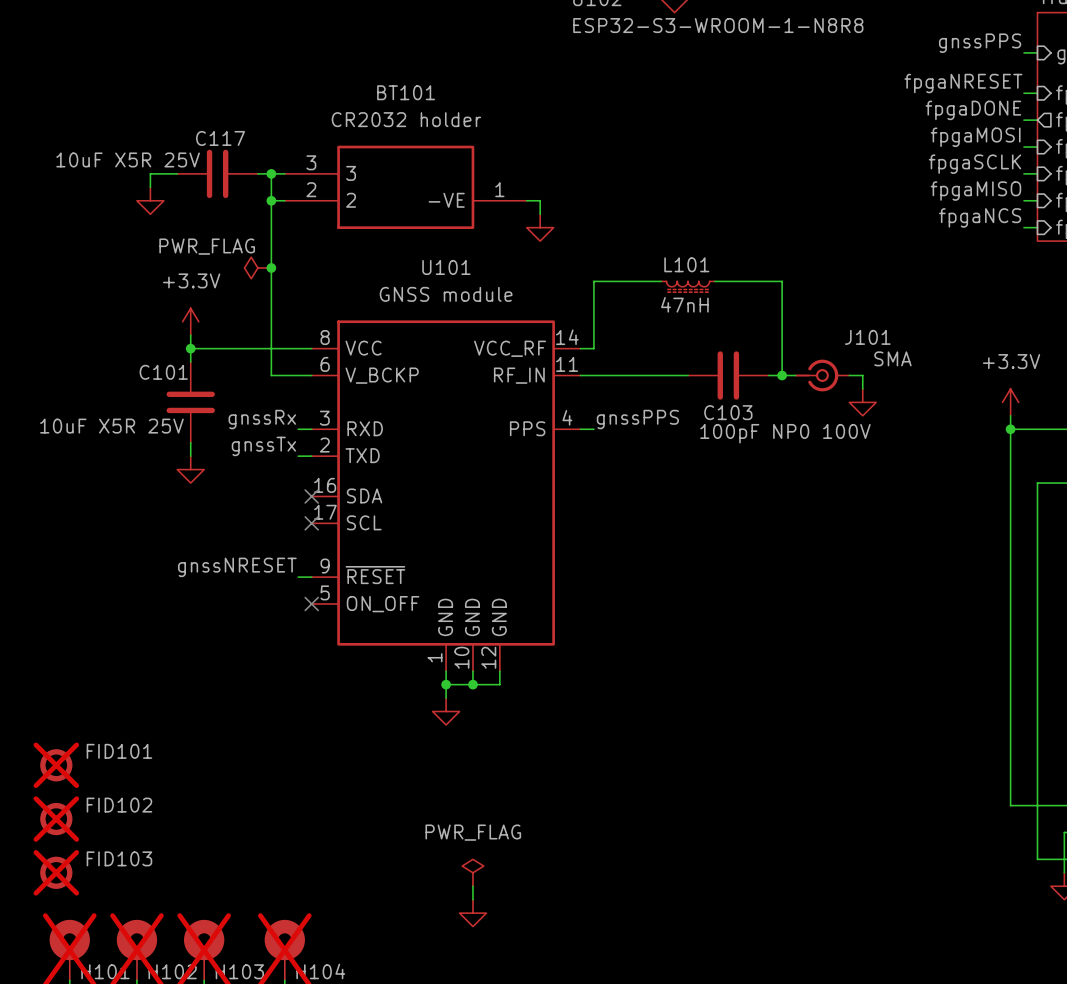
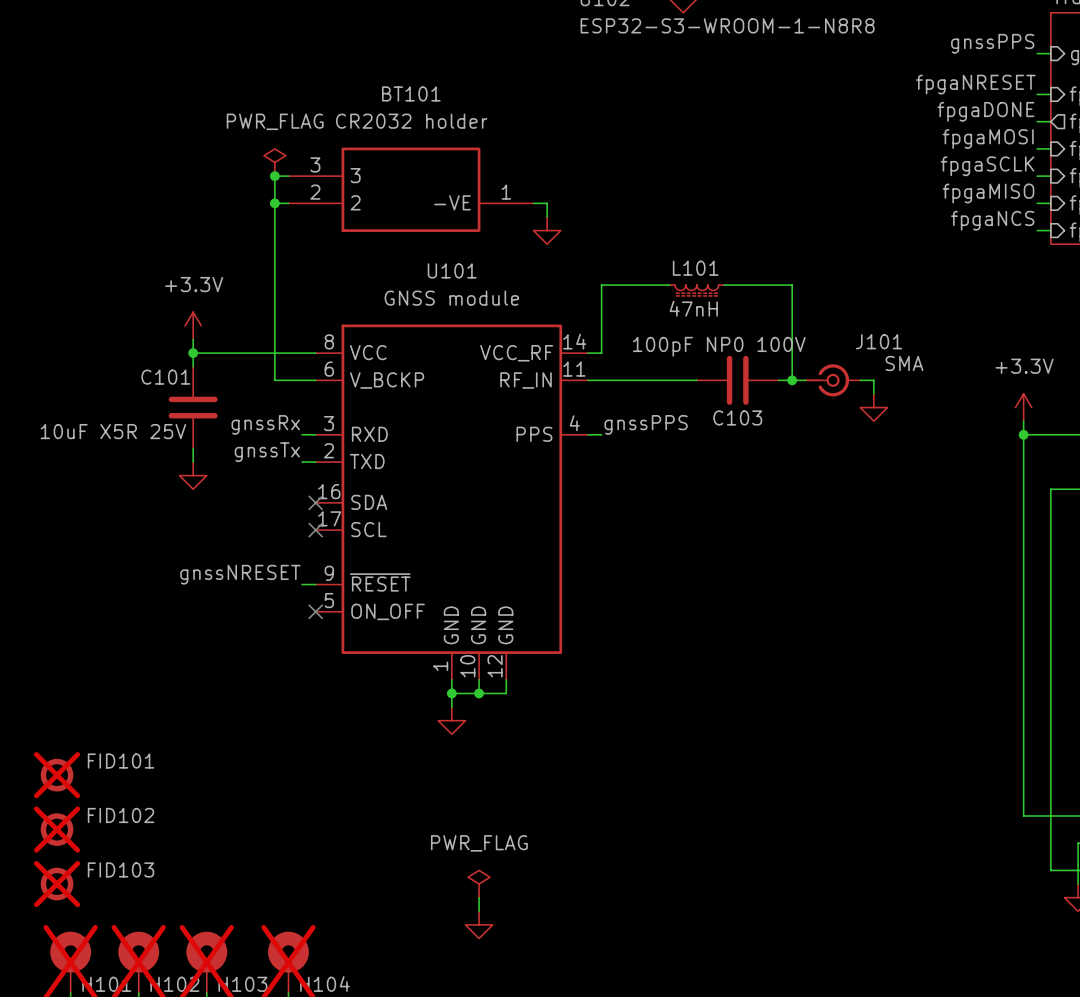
wire: (177, 173) (150, 173) (150, 187) -> none
C117: 10uF X5R 25V (217, 173) -> none
wire: (257, 173) (271, 173) -> none
power symbol: (150, 200) -> none
power symbol text position: PWR_FLAG (207, 246) -> PWR_FLAG (275, 121)
power symbol rotation: 0° (257, 267) -> 90° clockwise (274, 162)
power symbol position: PWR_FLAG (257, 267) -> PWR_FLAG (274, 162)
junction: (271, 267) -> none
C103 value position: 100pF NP0 100V (785, 433) -> 100pF NP0 100V (719, 346)

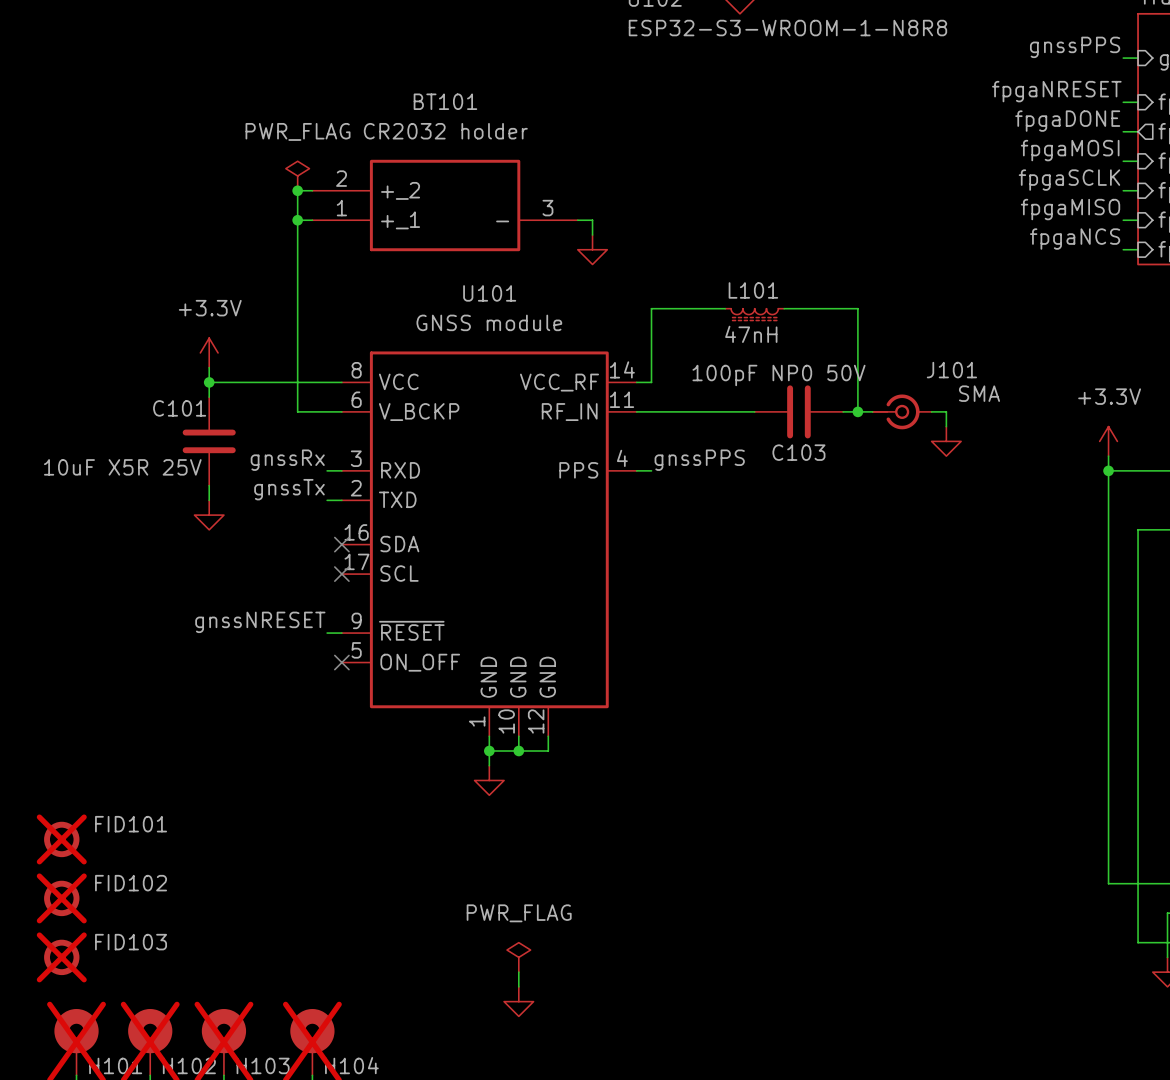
BT101 pin number: 3 (315, 164) -> 2 (341, 178)
BT101 pin name: 3 (355, 175) -> +_2 (400, 190)
BT101 pin number: 2 (315, 192) -> 1 (341, 208)
BT101 pin number: 1 (506, 192) -> 3 (547, 208)
BT101 pin name: 2 (355, 202) -> +_1 (400, 220)
BT101 pin name: -VE (452, 202) -> - (502, 221)
C103 value: 100pF NP0 100V (719, 346) -> 100pF NP0 50V (779, 375)

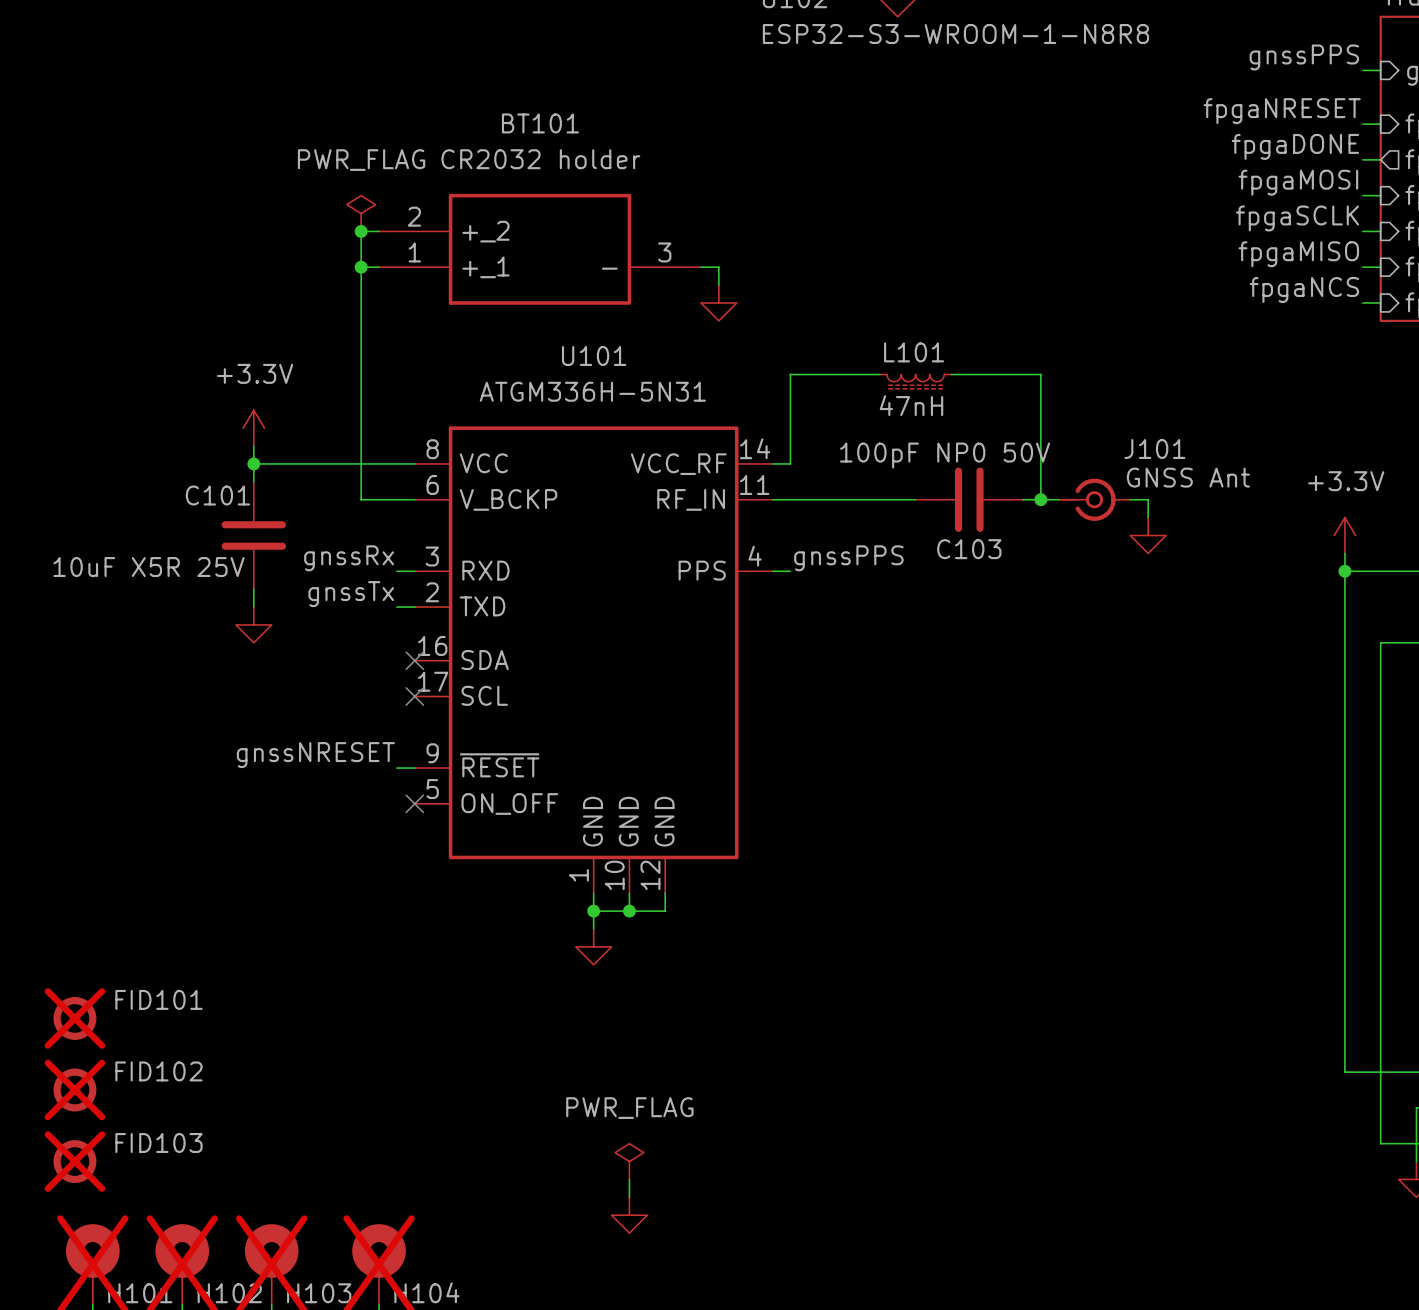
U101 value: GNSS module (489, 322) -> ATGM336H-5N31 (592, 391)
J101 value: SMA (979, 393) -> GNSS Ant (1188, 477)

